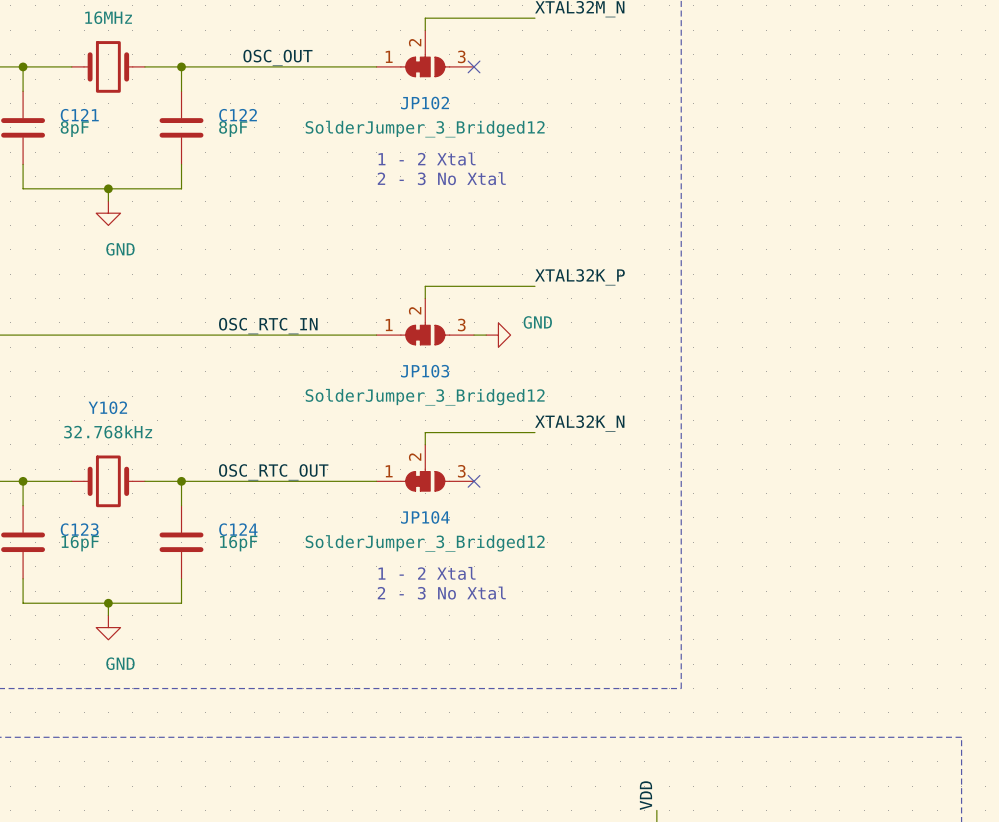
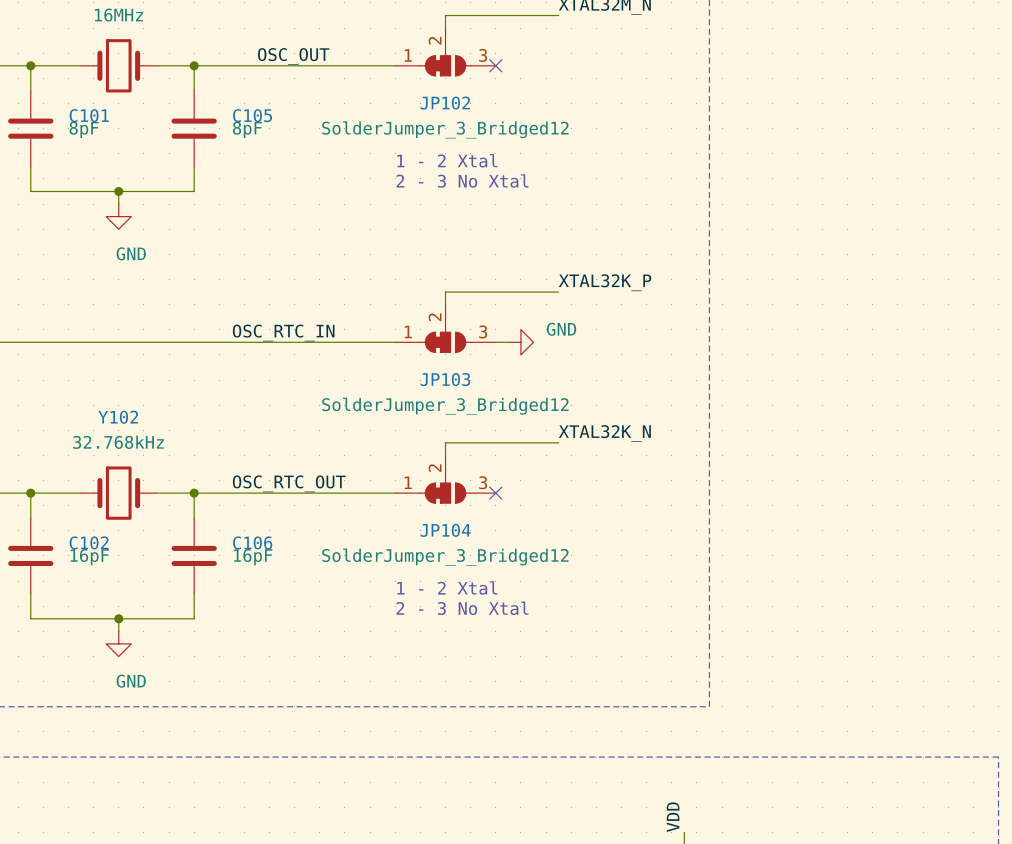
C121 name: C121 (79, 115) -> C101 (89, 115)
C122 name: C122 (238, 115) -> C105 (252, 115)
C123 name: C123 (79, 529) -> C102 (89, 542)
C124 name: C124 (238, 529) -> C106 (252, 542)

